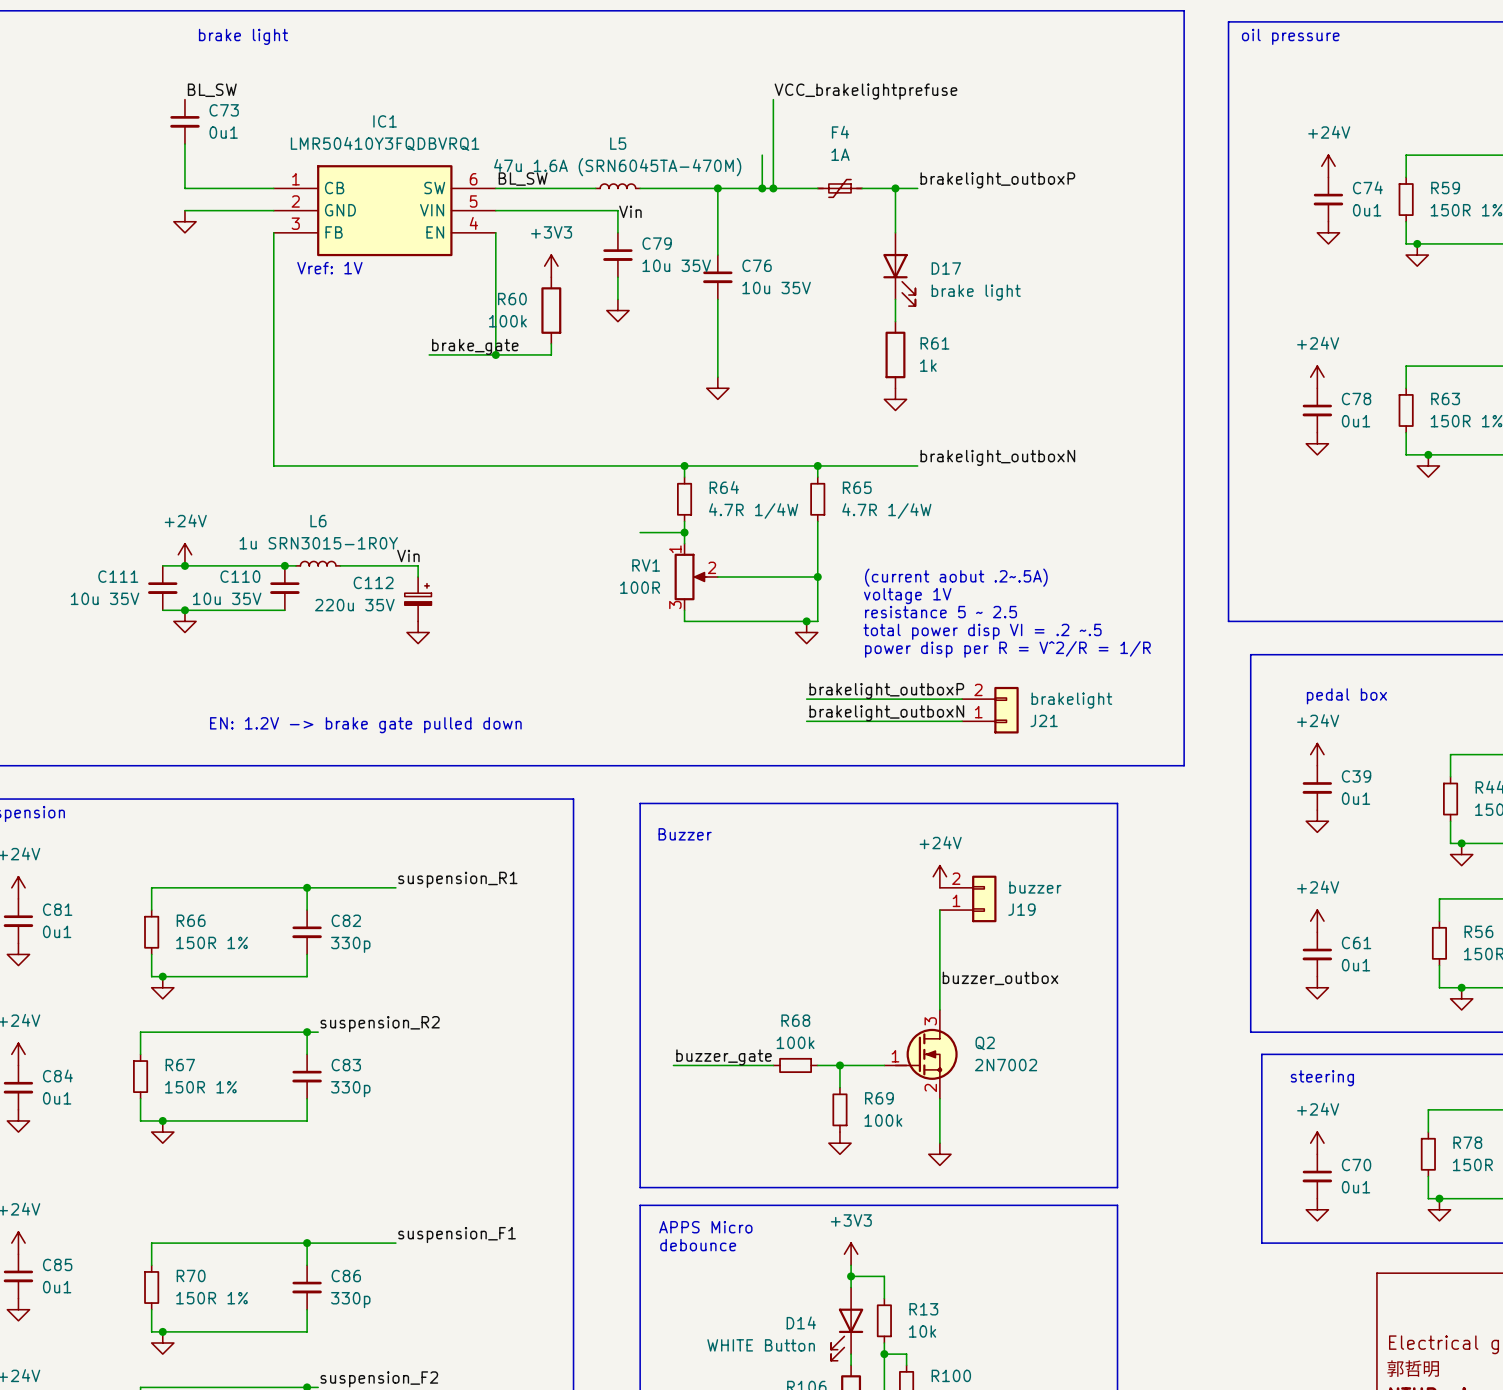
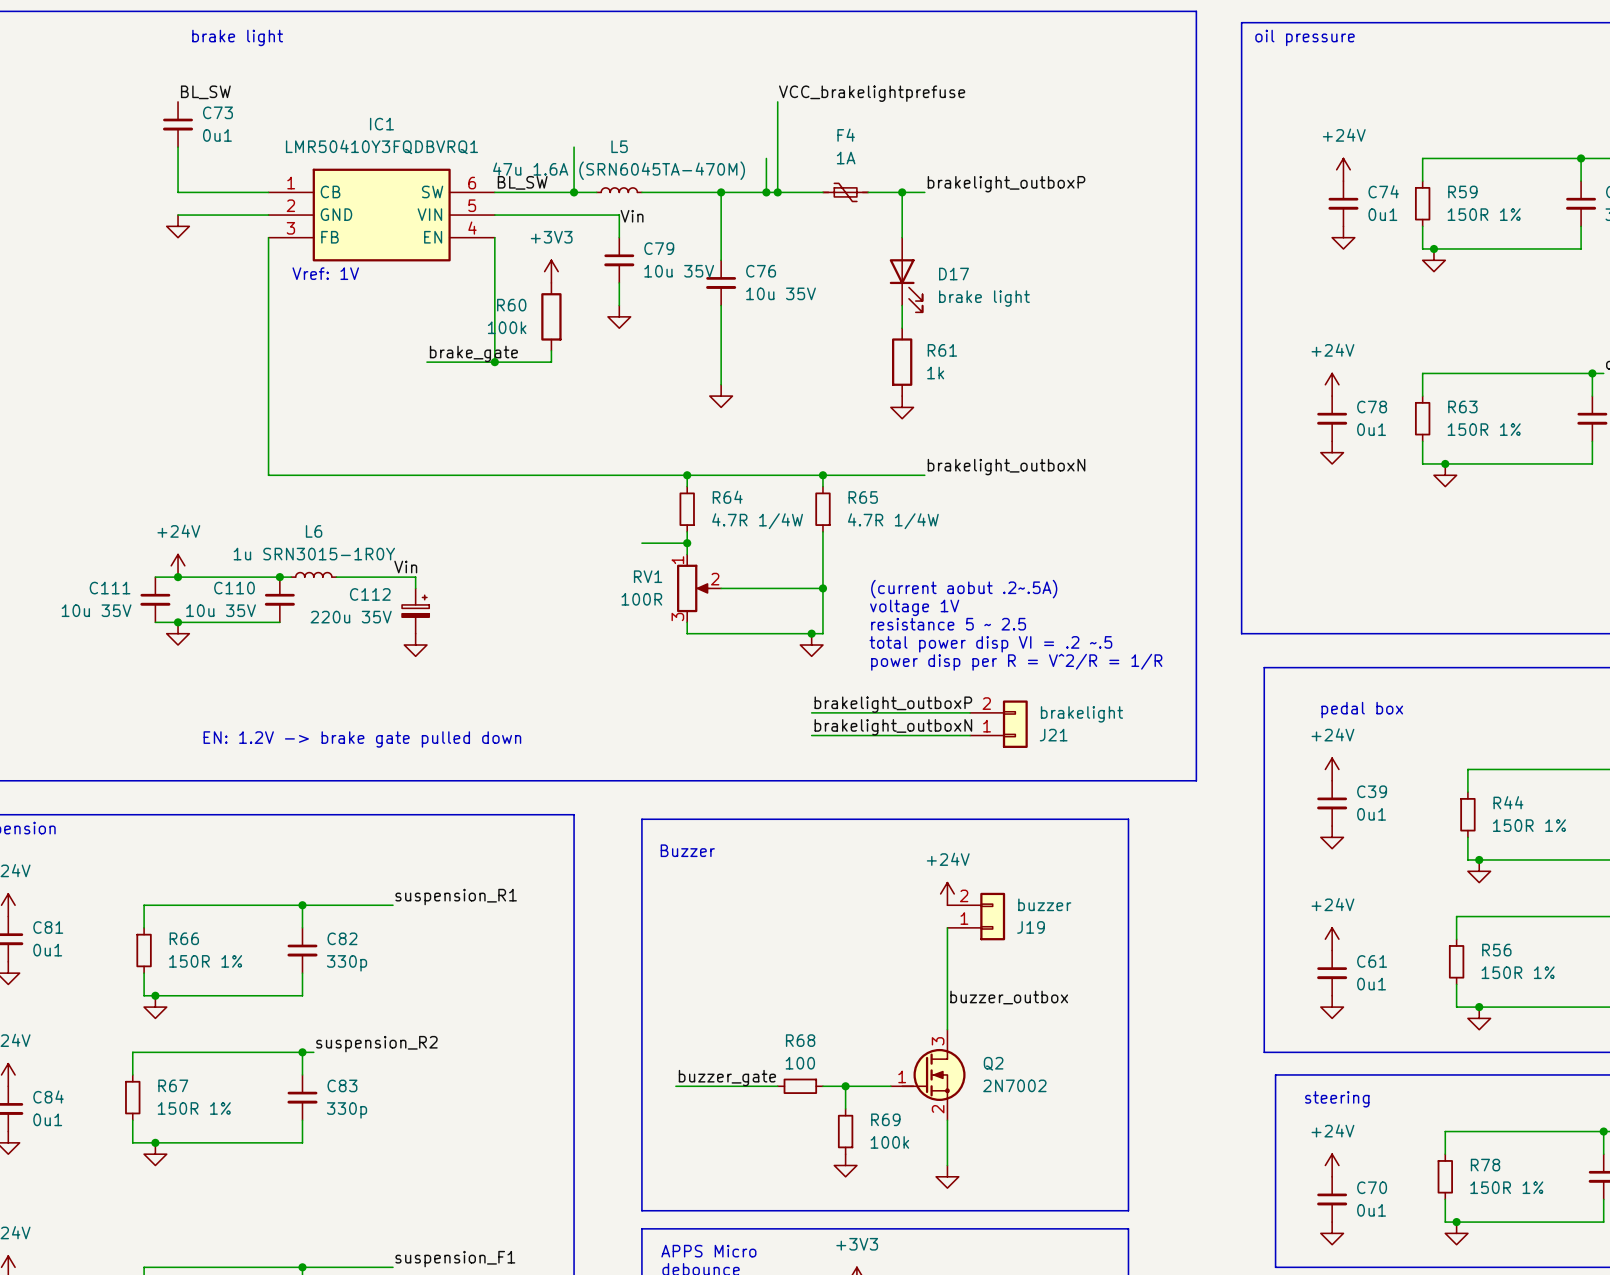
wire: none -> (574, 147) (574, 192)
junction: none -> (574, 192)
F4 flip: as is (839, 188) -> left-right (845, 192)
R68 value: 100k (795, 1042) -> 100 (800, 1063)

